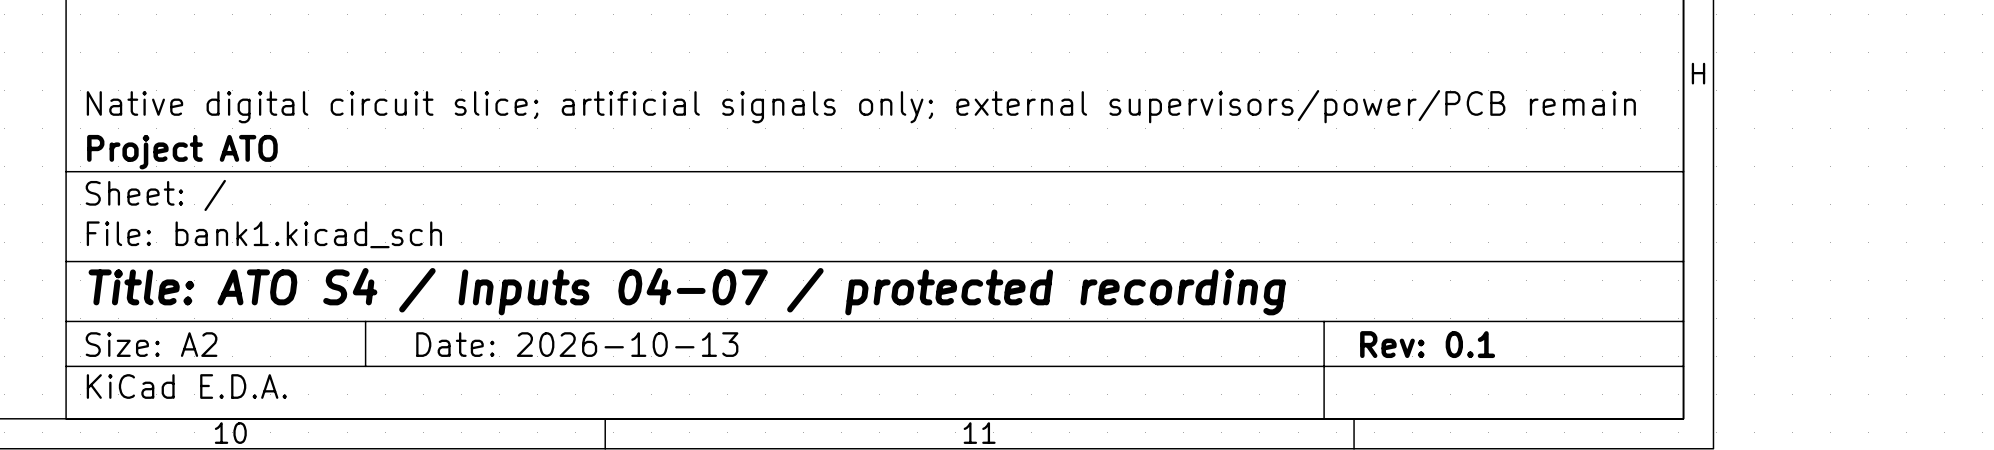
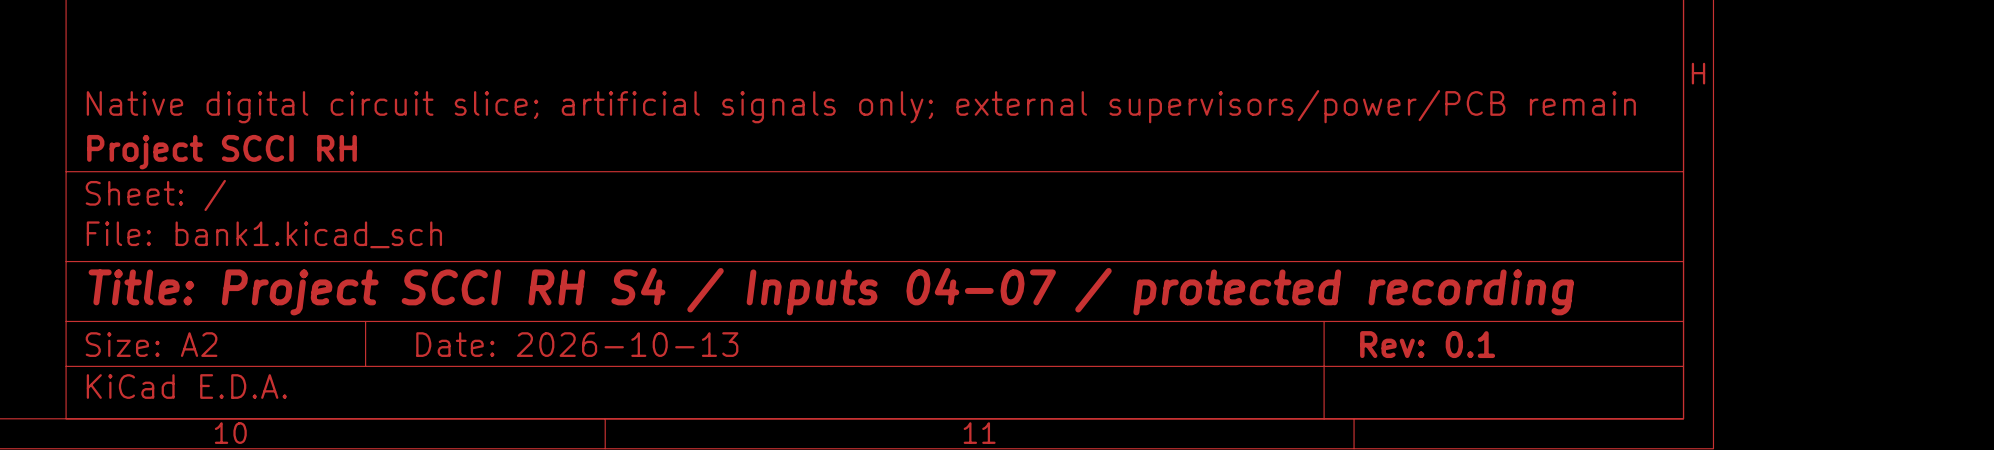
title block: Project ATO (182, 152) -> Project SCCI RH (222, 152)
title block: Title: ATO S4 / Inputs 04-07 / protected recording (687, 291) -> Title: Project SCCI RH S4 / Inputs 04-07 / protected recording (831, 291)

